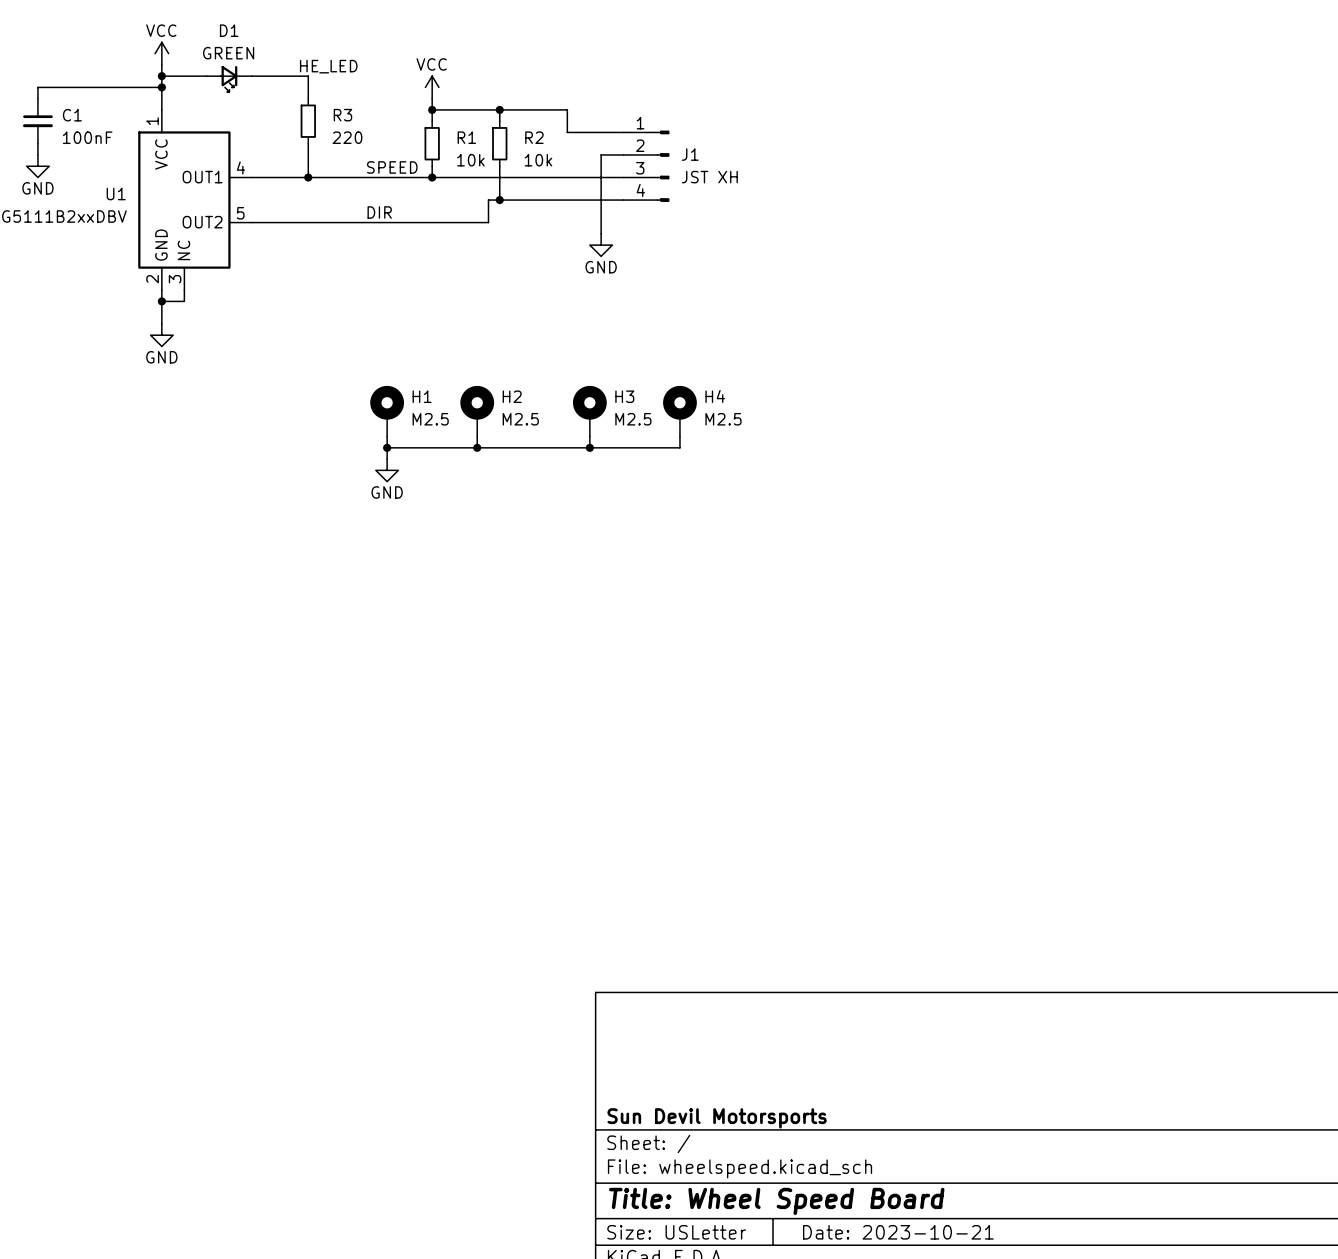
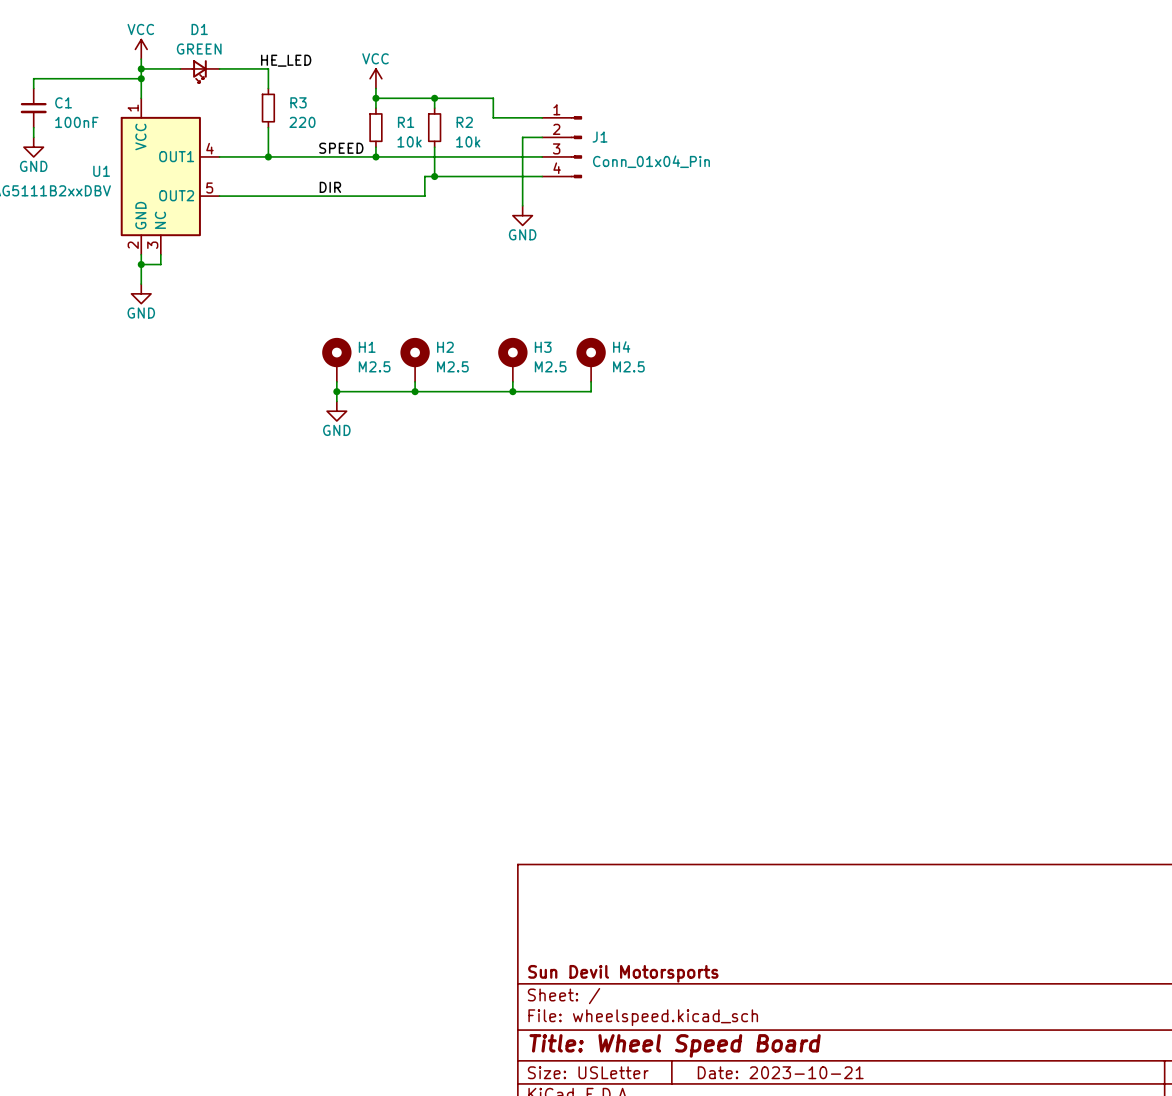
J1 value: JST XH (709, 177) -> Conn_01x04_Pin (651, 161)

